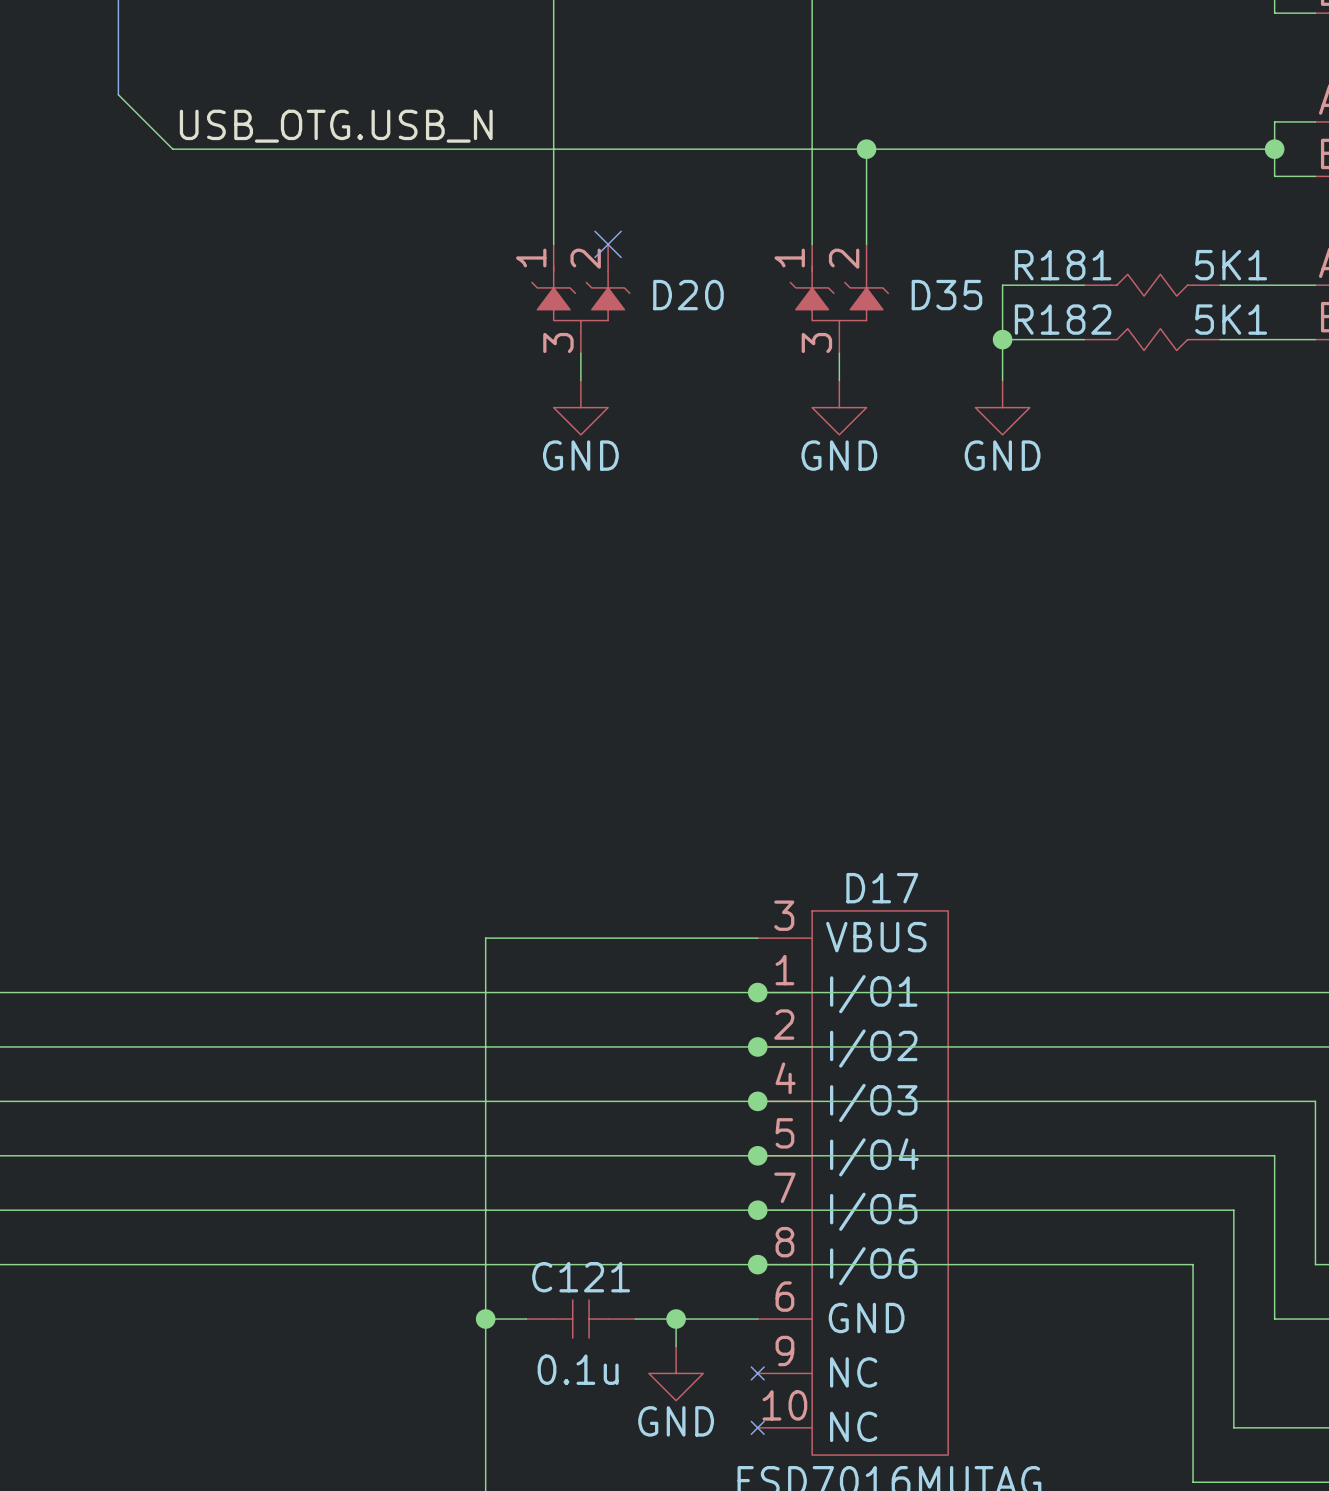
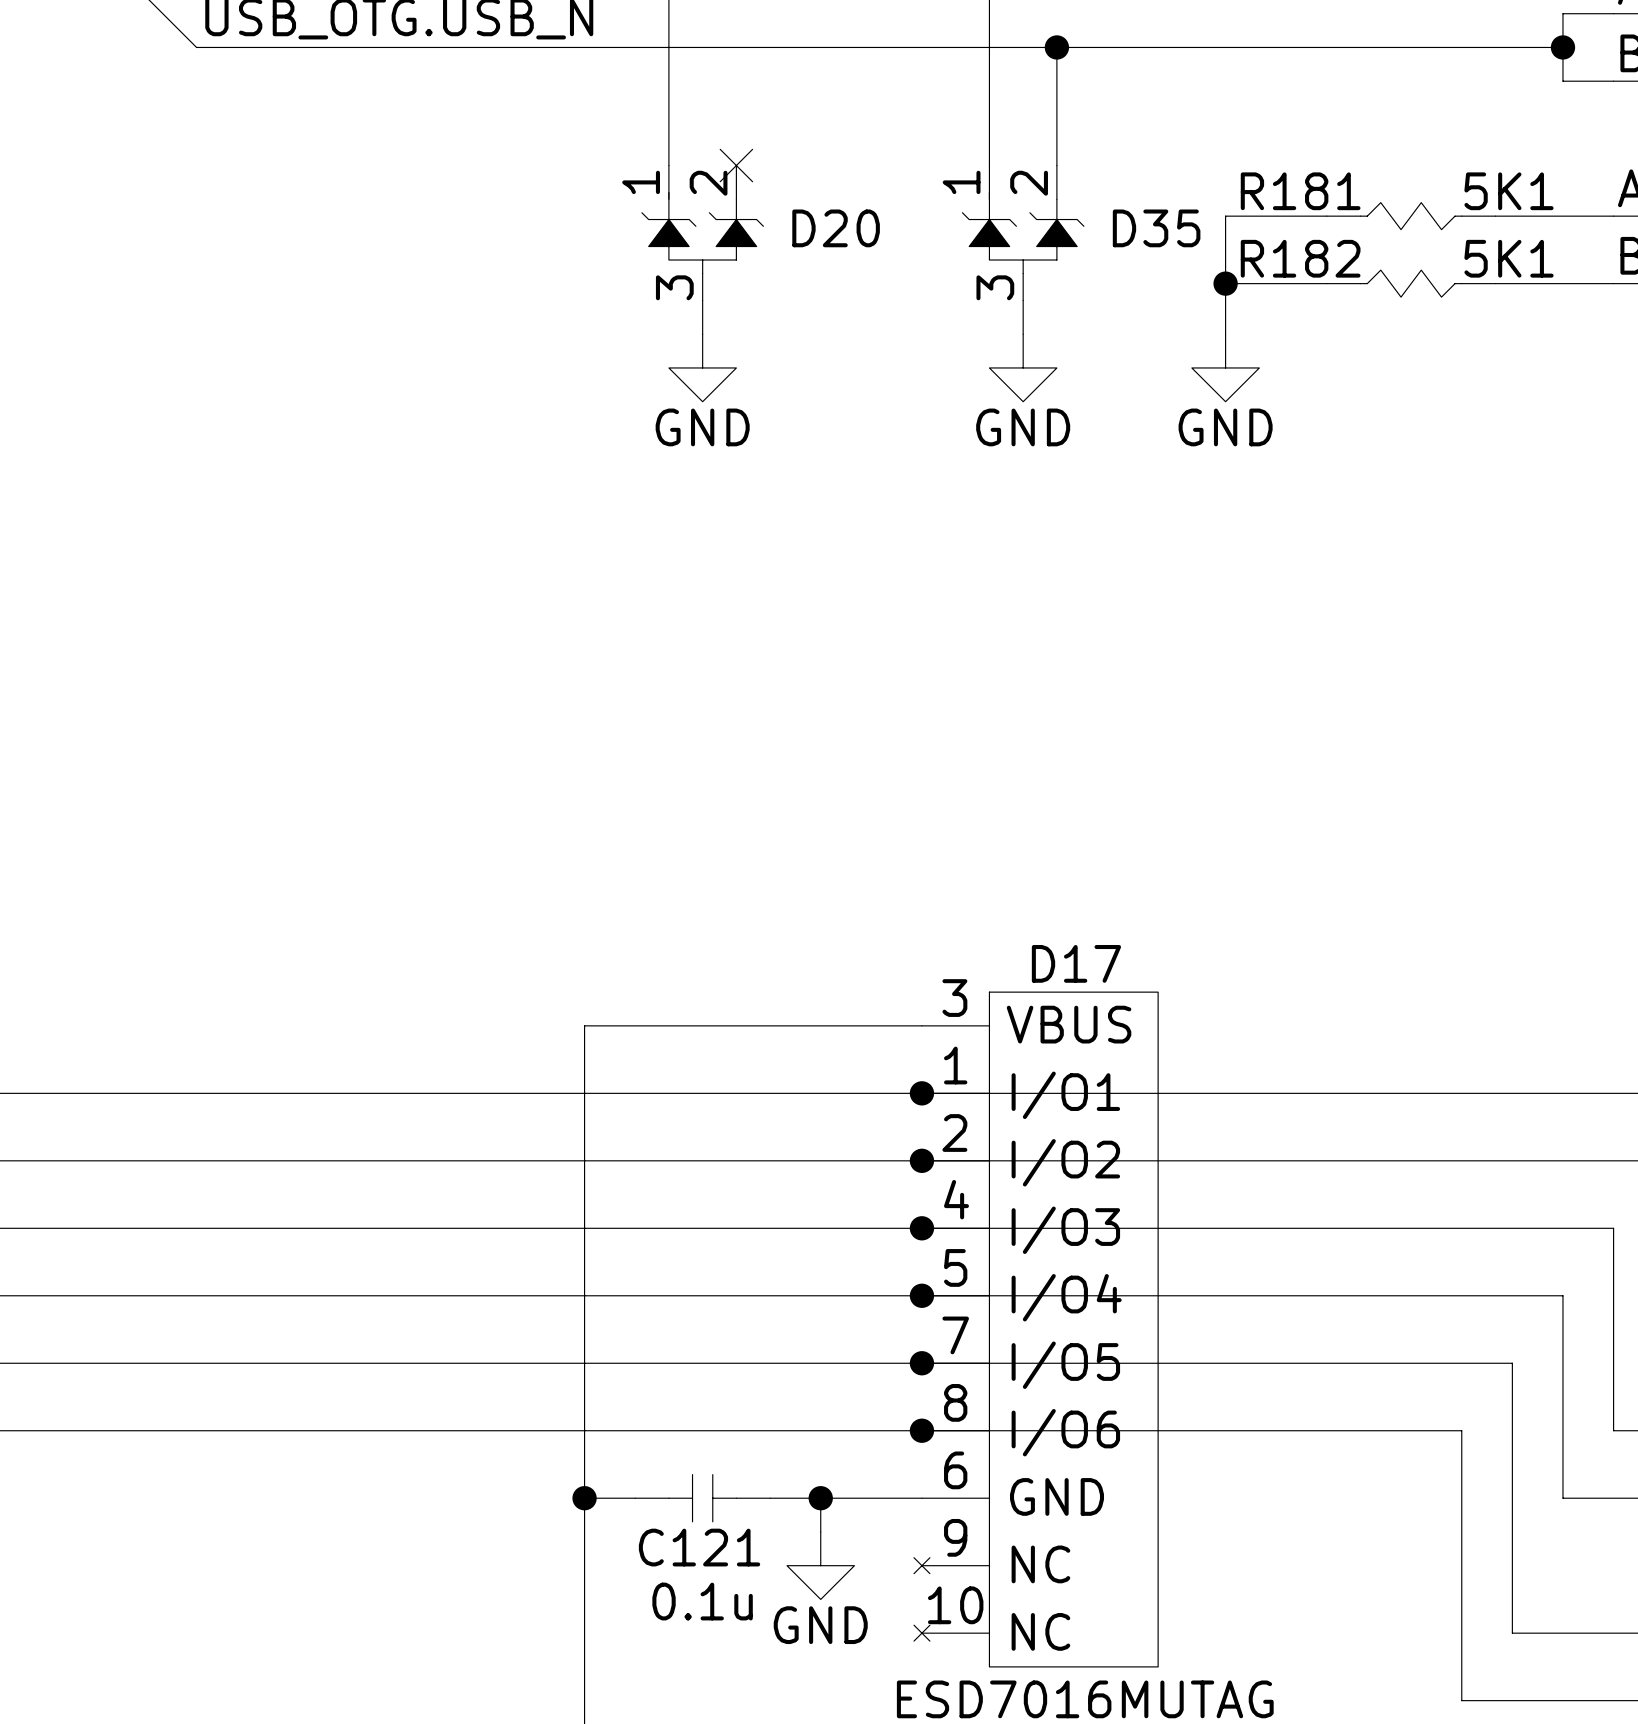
C121 name position: C121 (581, 1277) -> C121 (699, 1547)
C121 value position: 0.1u (578, 1369) -> 0.1u (702, 1601)

